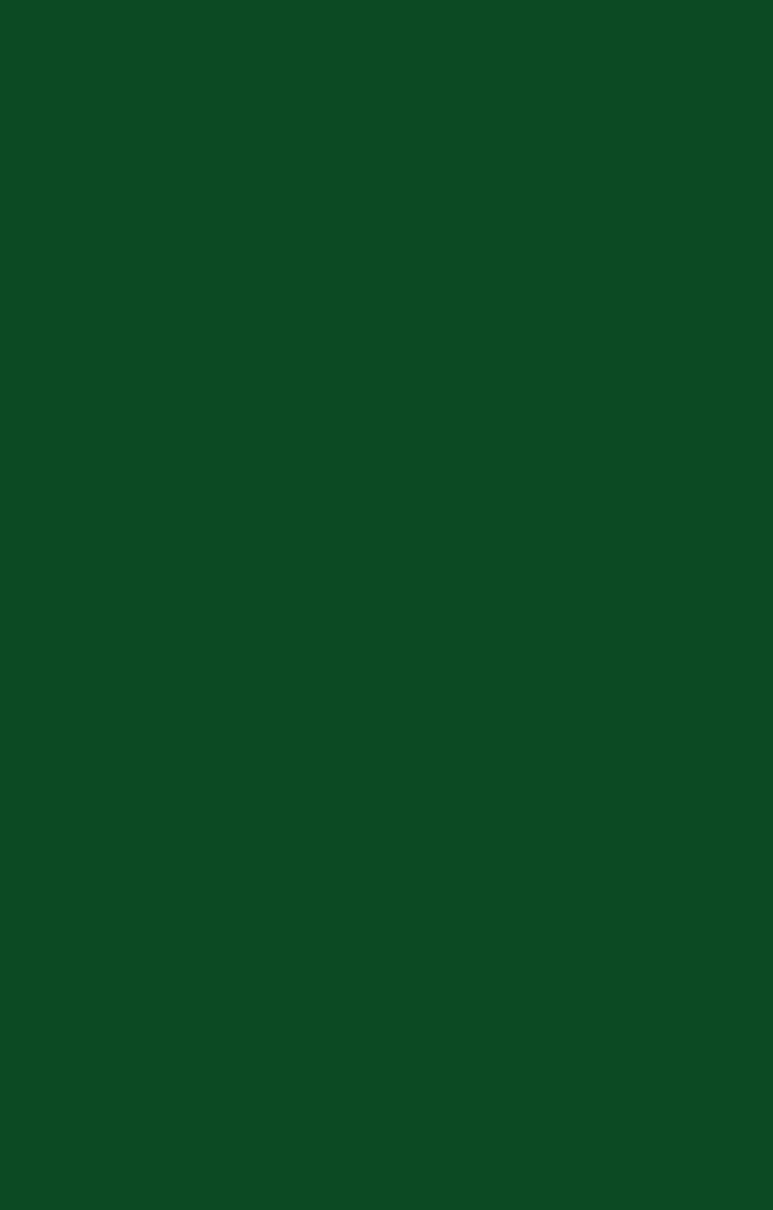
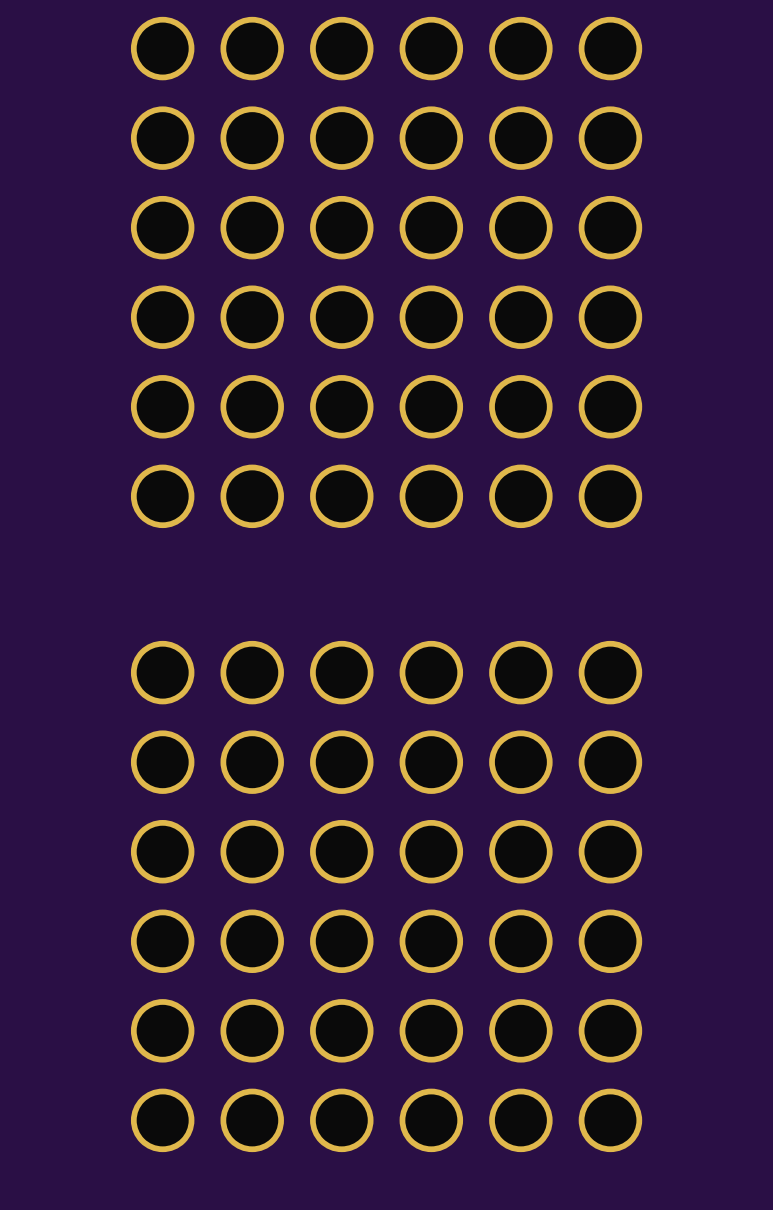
part: none -> (386, 272)
part: none -> (386, 896)

